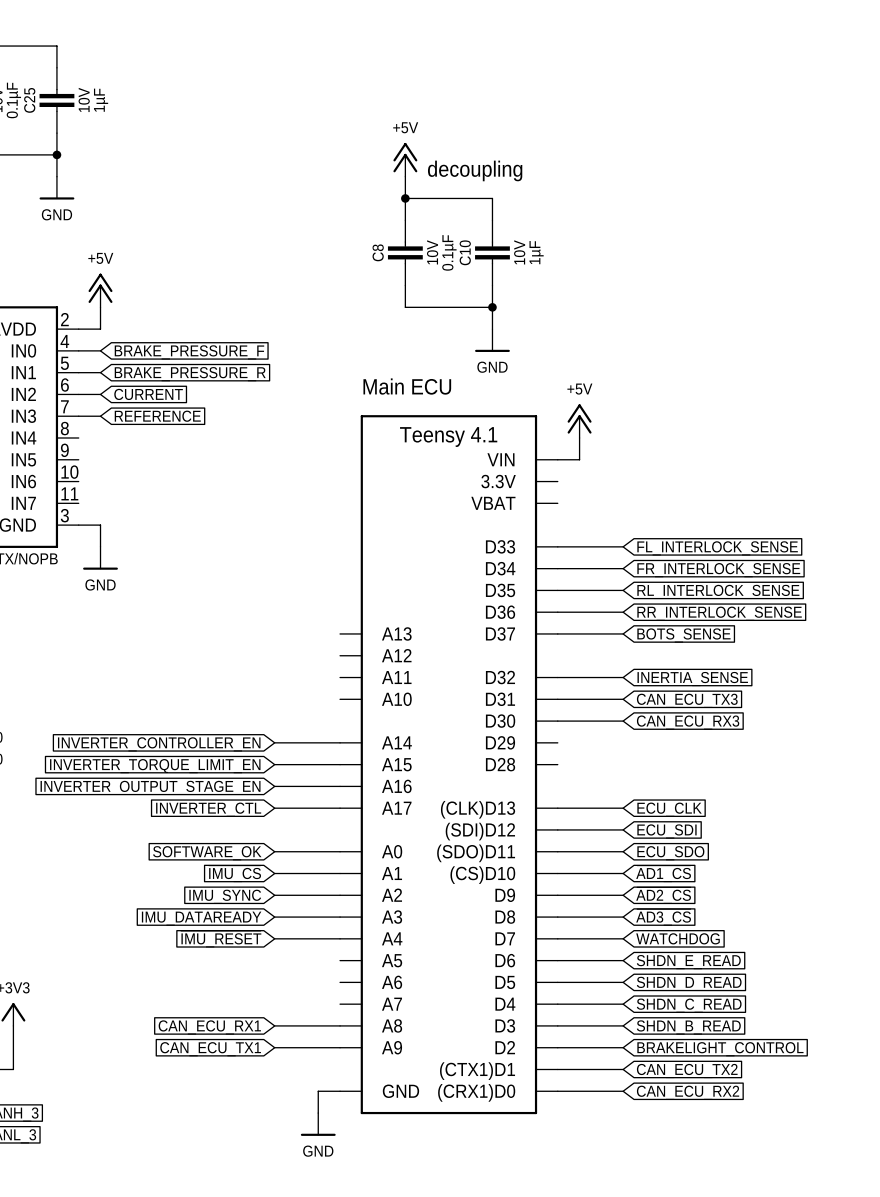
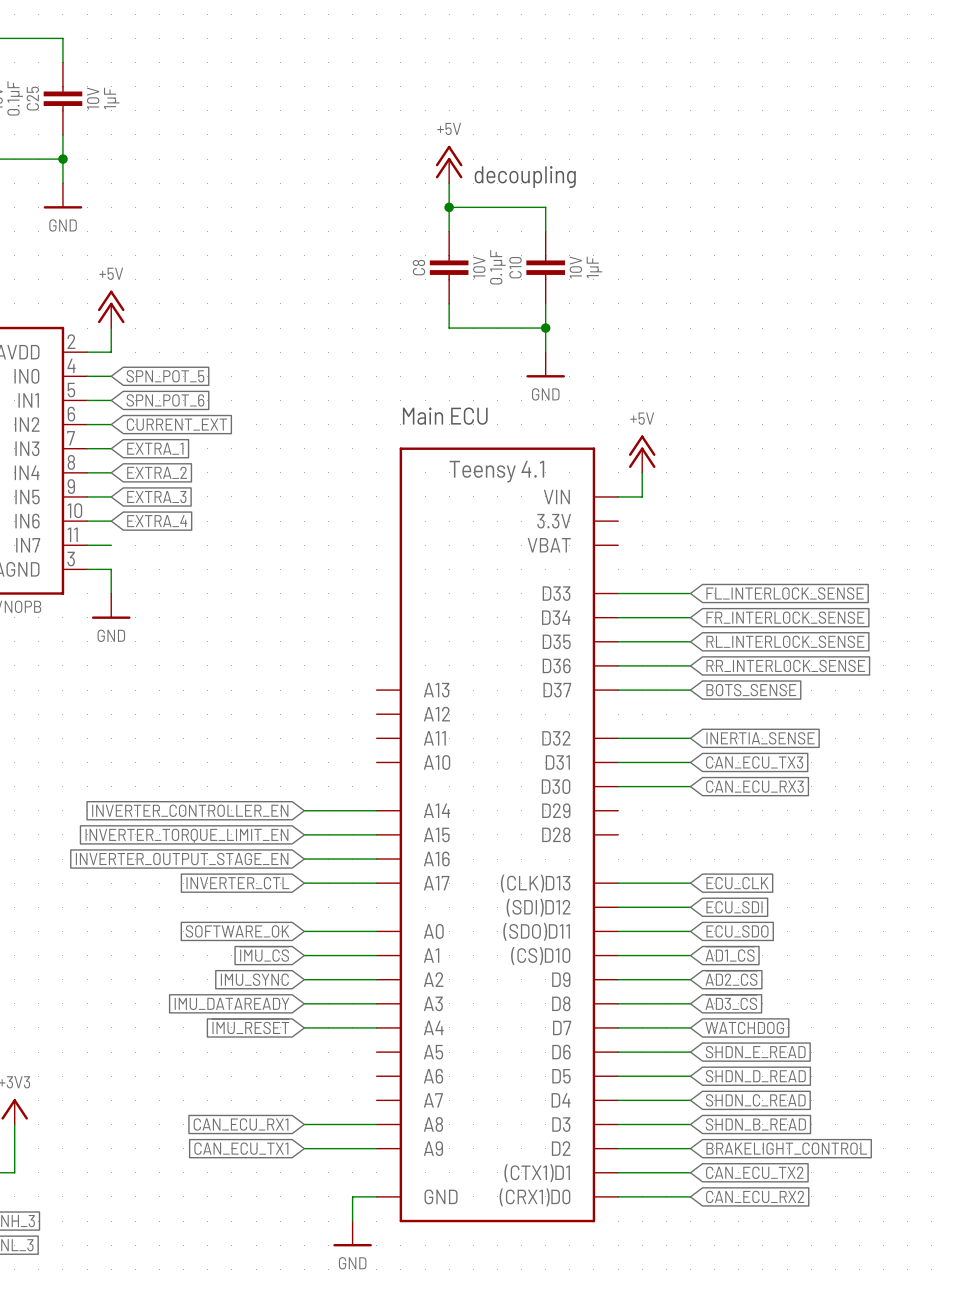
global label: BRAKE_PRESSURE_F (189, 352) -> SPN_POT_5 (165, 376)
global label: BRAKE_PRESSURE_R (190, 374) -> SPN_POT_6 (165, 400)
global label: CURRENT (148, 394) -> CURRENT_EXT (176, 424)
global label: REFERENCE (157, 416) -> EXTRA_1 (155, 448)
wire: none -> (87, 472) (111, 472)
global label: none -> EXTRA_2 (157, 472)
wire: none -> (87, 496) (111, 496)
global label: none -> EXTRA_3 (156, 497)
wire: none -> (87, 521) (111, 521)
global label: none -> EXTRA_4 (157, 521)
wire: none -> (87, 545) (111, 545)

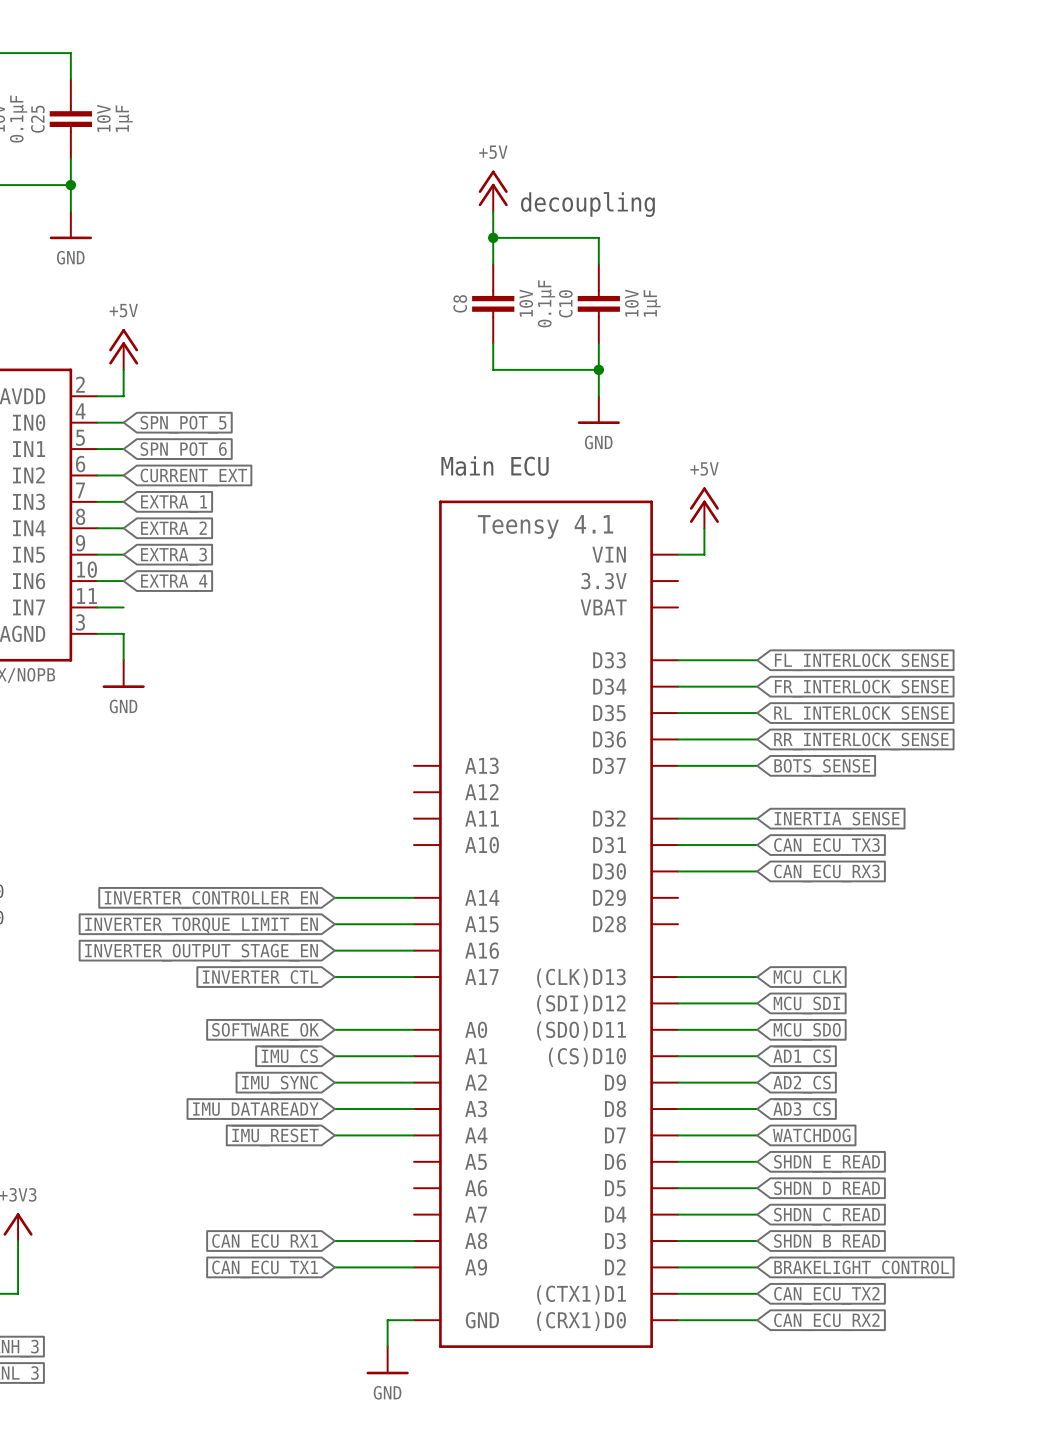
global label: ECU_CLK (737, 883) -> MCU_CLK (807, 979)
global label: ECU_SDI (734, 907) -> MCU_SDI (806, 1005)
global label: ECU_SDO (737, 931) -> MCU_SDO (807, 1031)

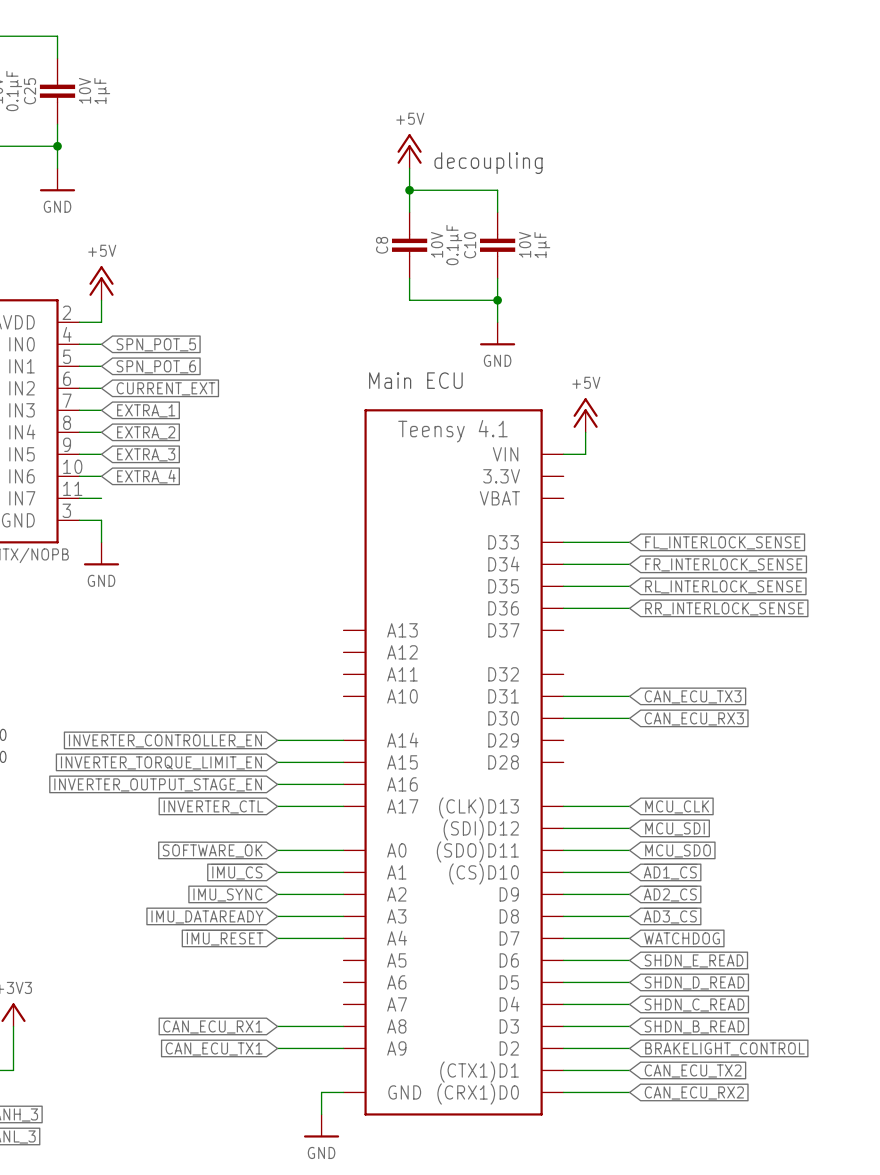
wire: (678, 765) (757, 765) -> none
global label: BOTS_SENSE (822, 767) -> none
wire: (678, 818) (757, 818) -> none
global label: INERTIA_SENSE (837, 820) -> none

